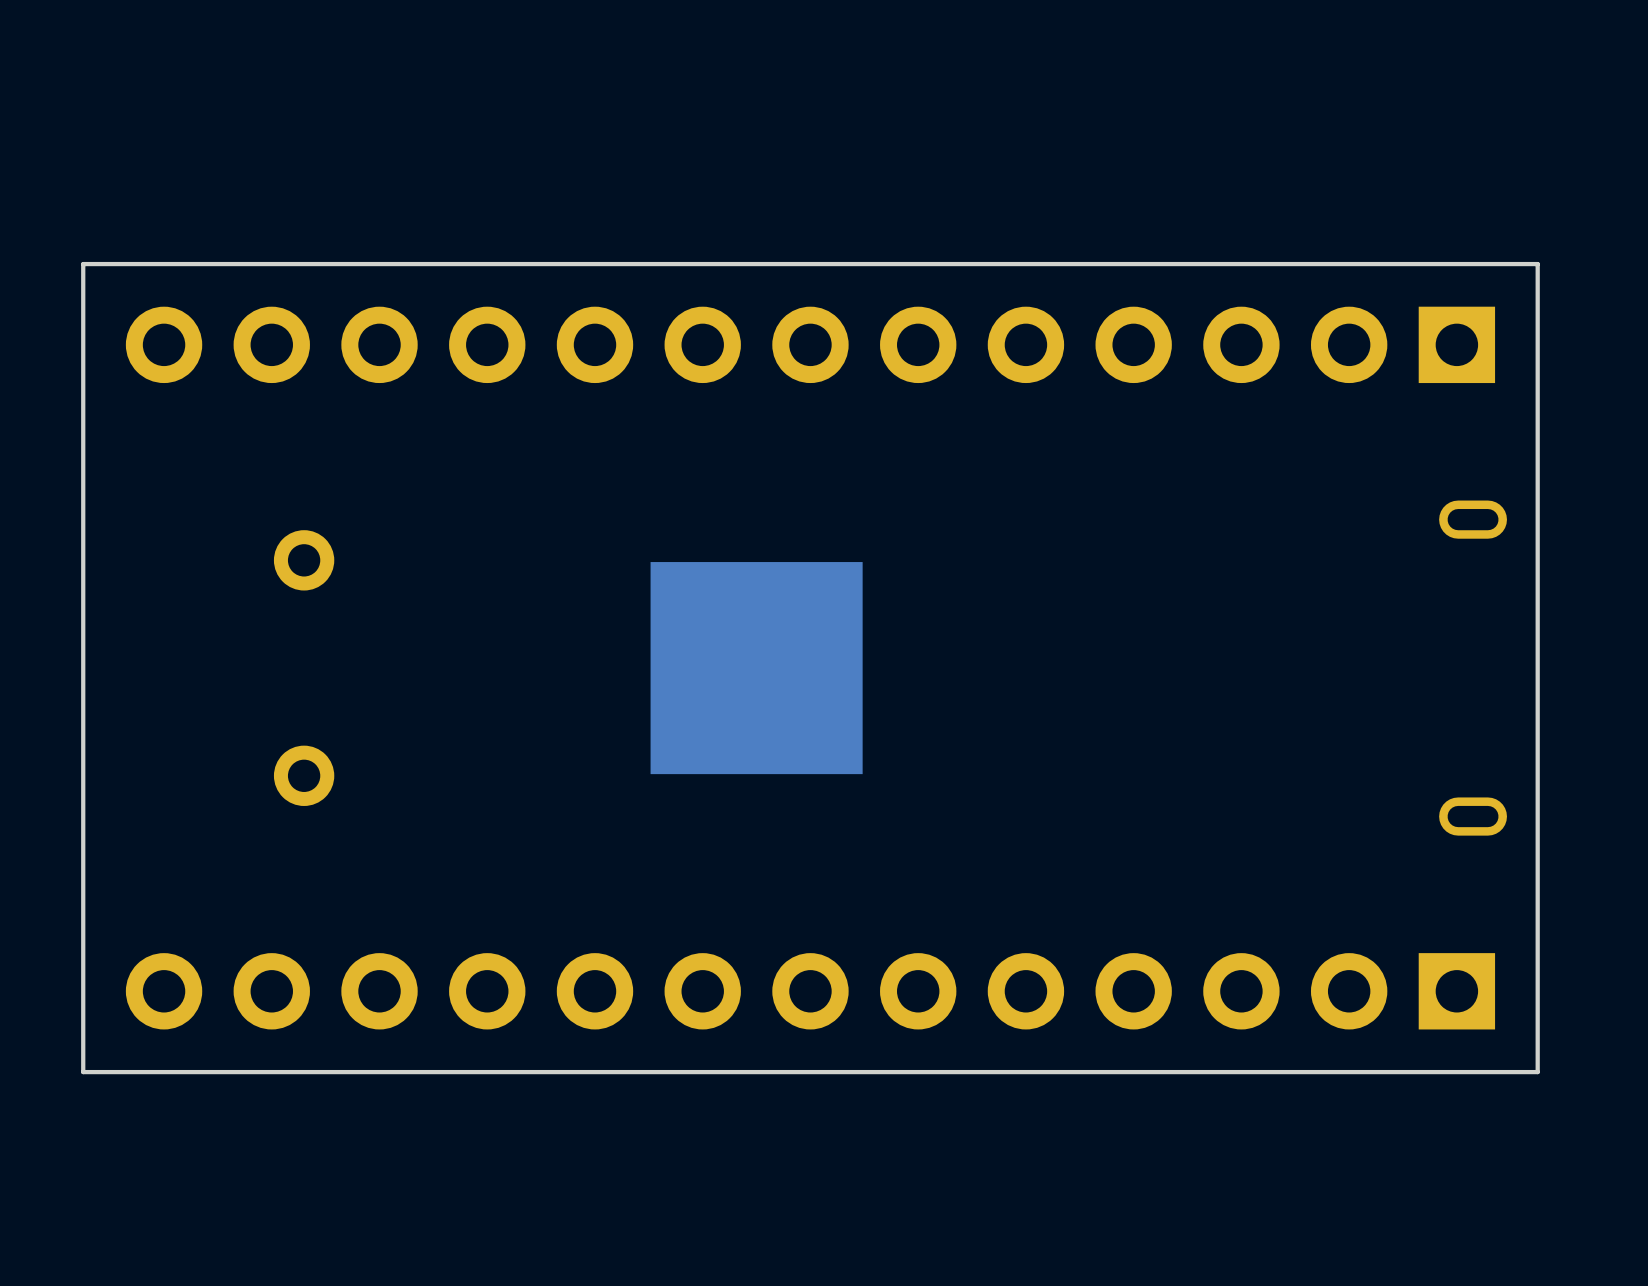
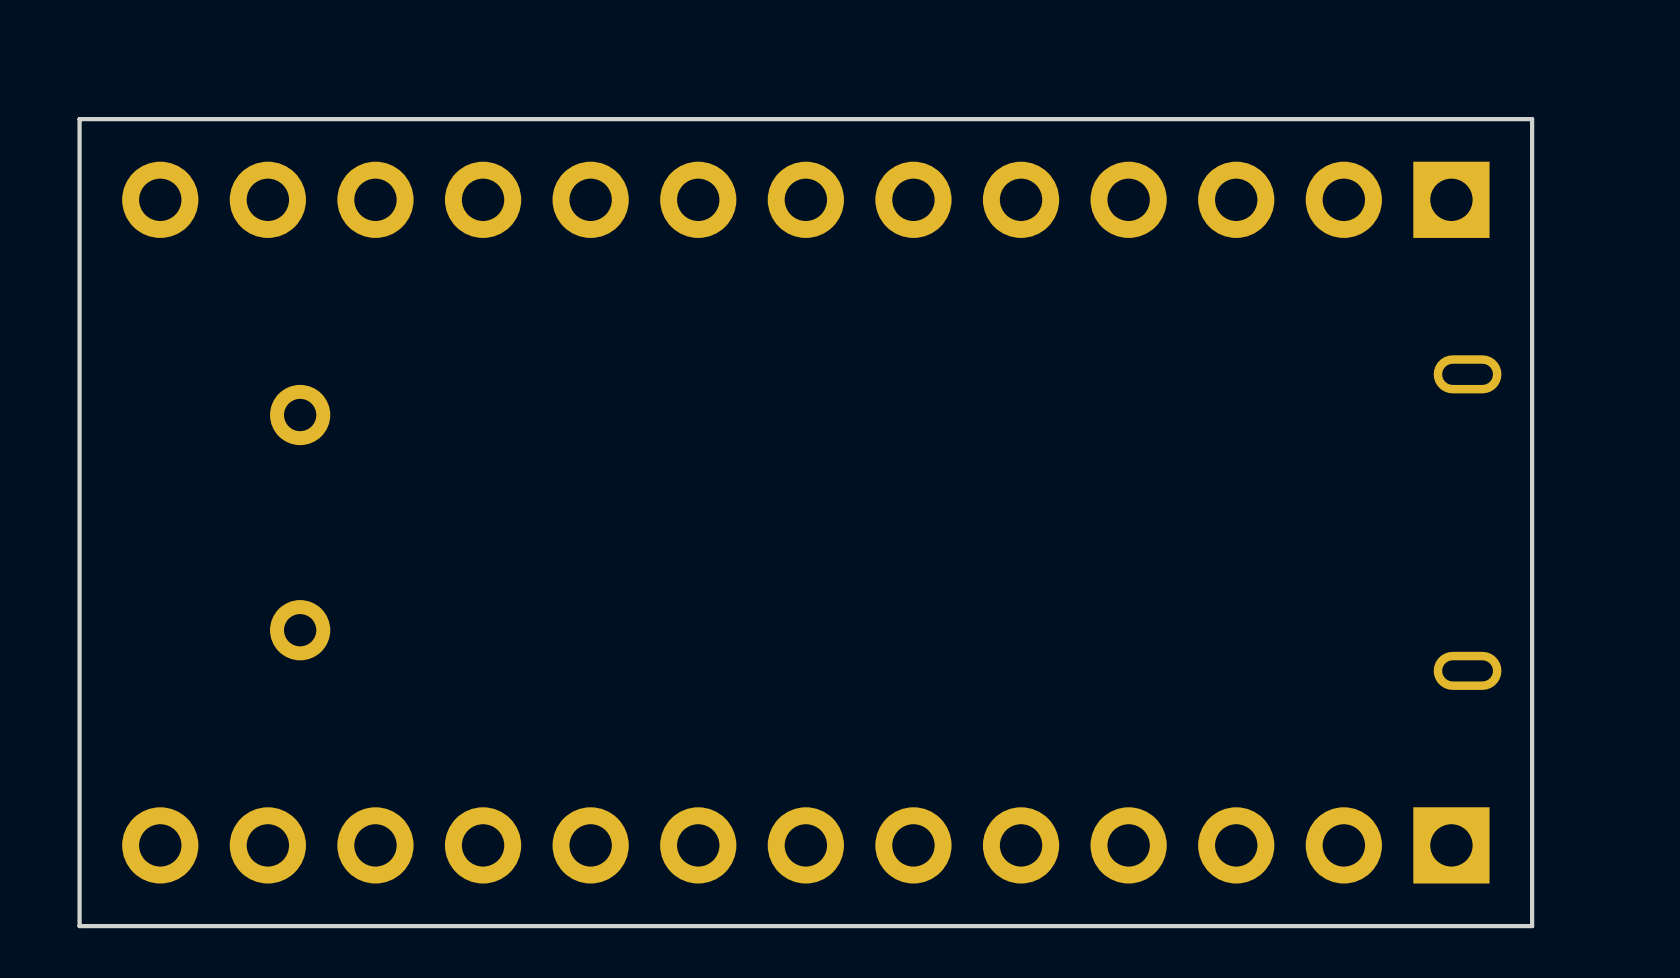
part: (756, 668) -> none

